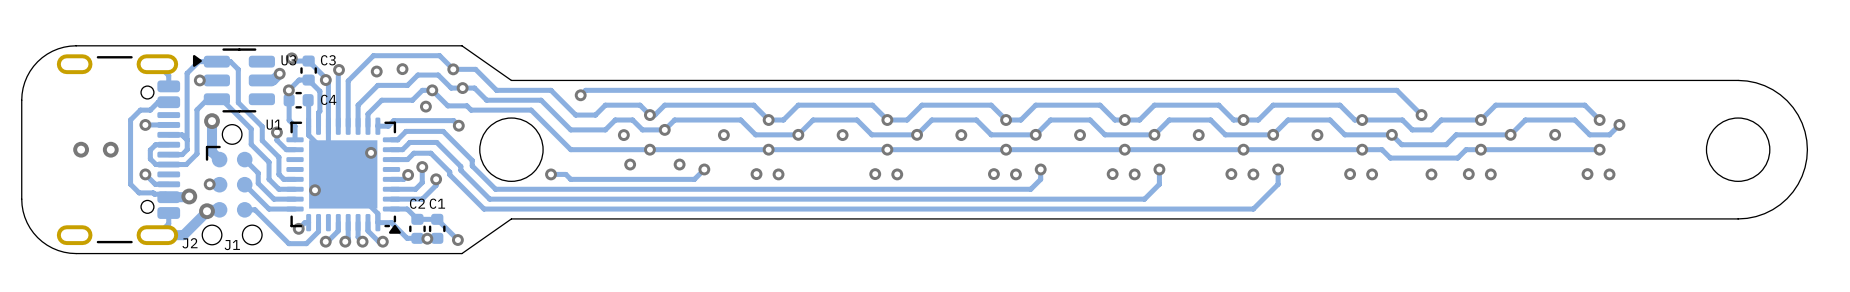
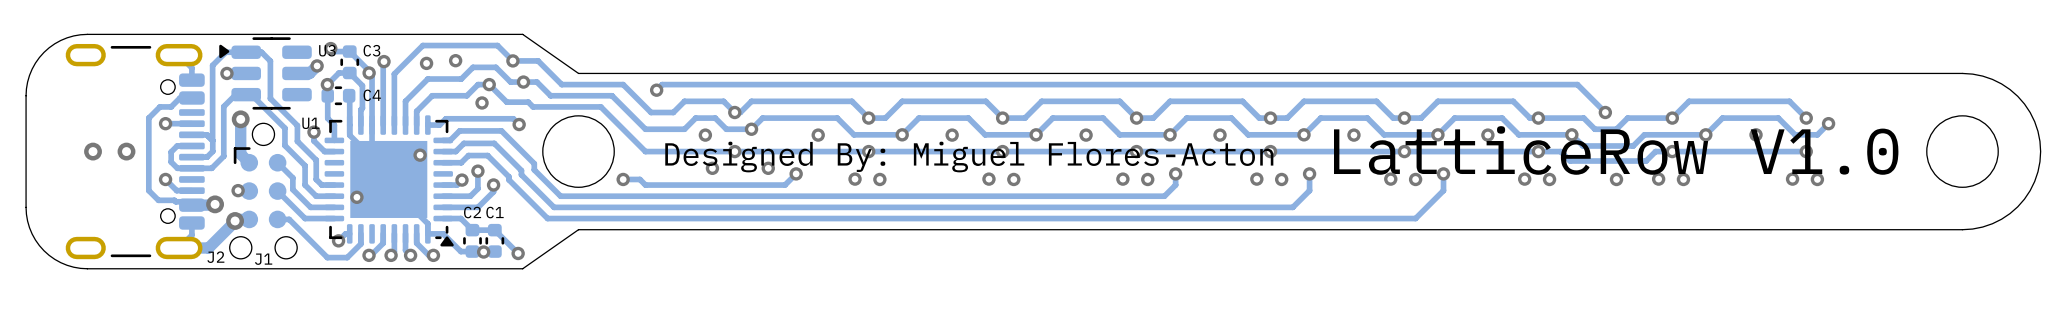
text: none -> LatticeRow V1.0 (1616, 150)
text: none -> Designed By: Miguel Flores-Acton (969, 157)

